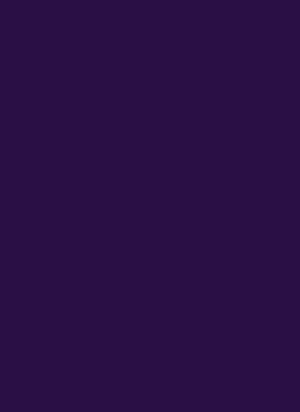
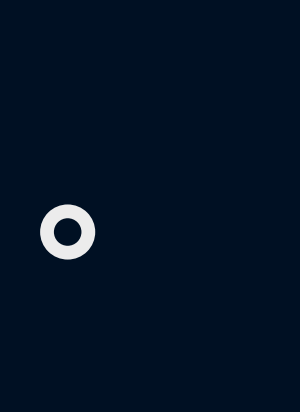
via: none -> (67, 232)

